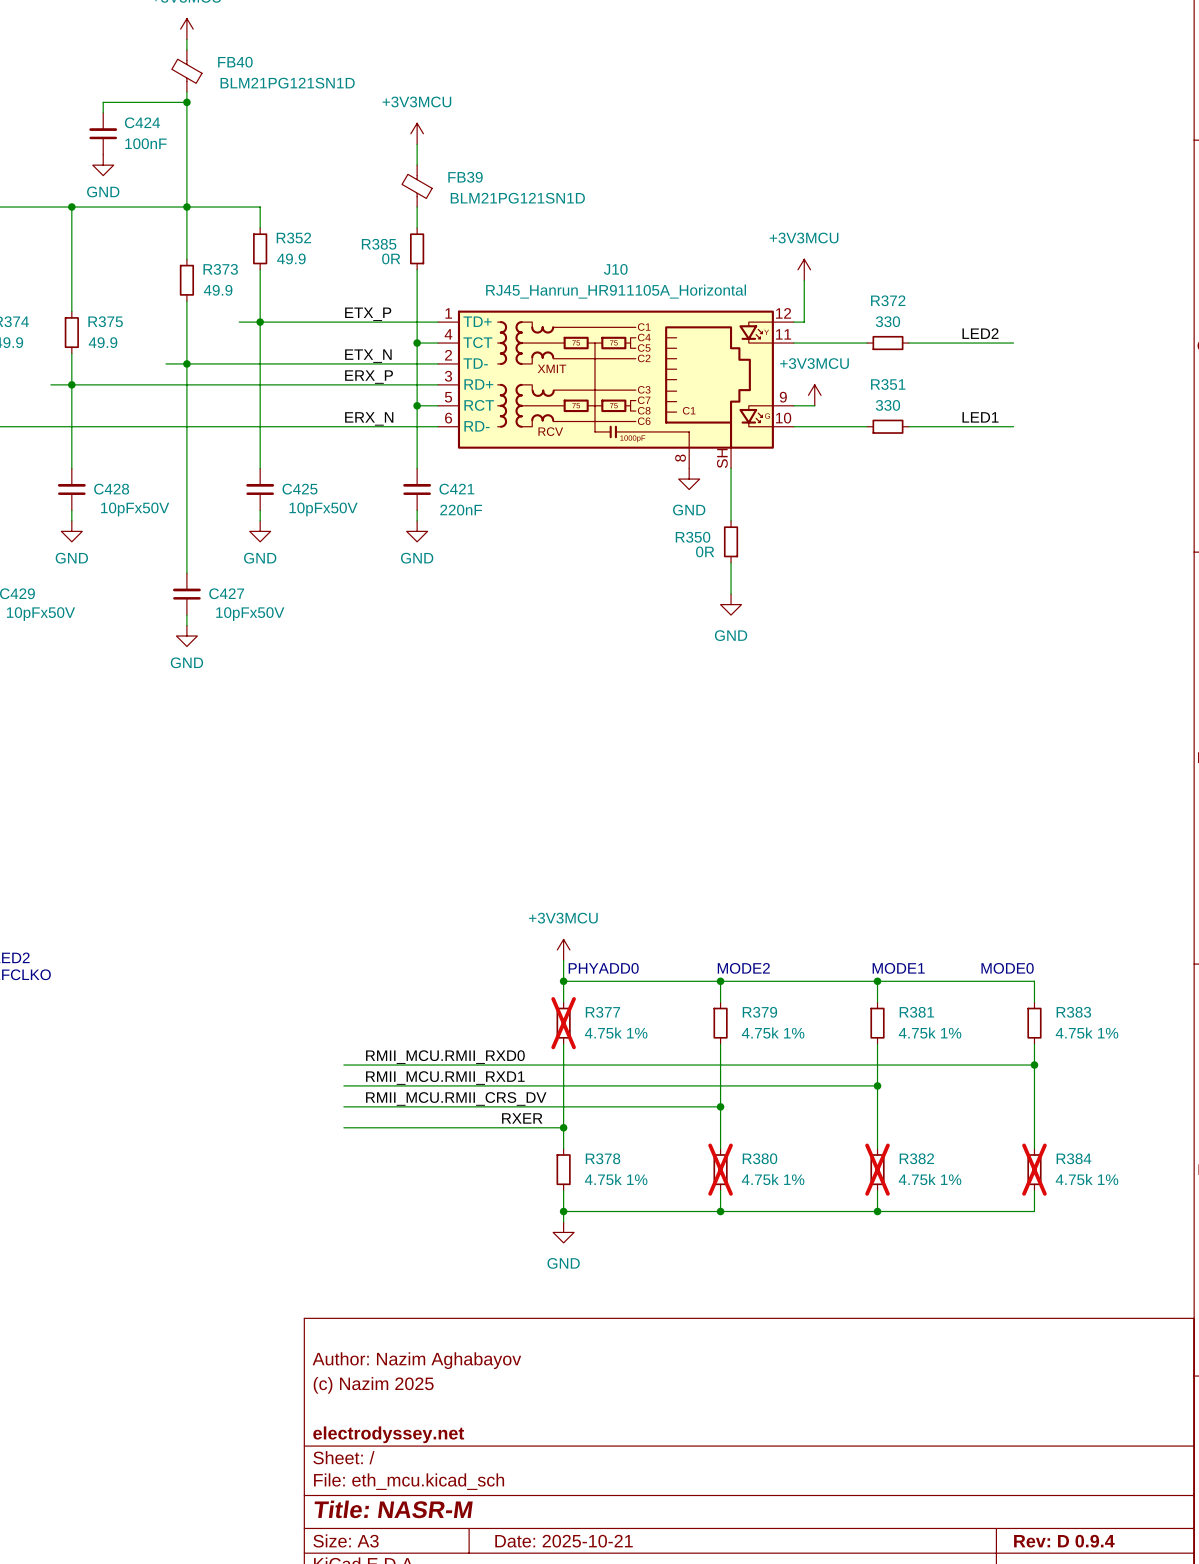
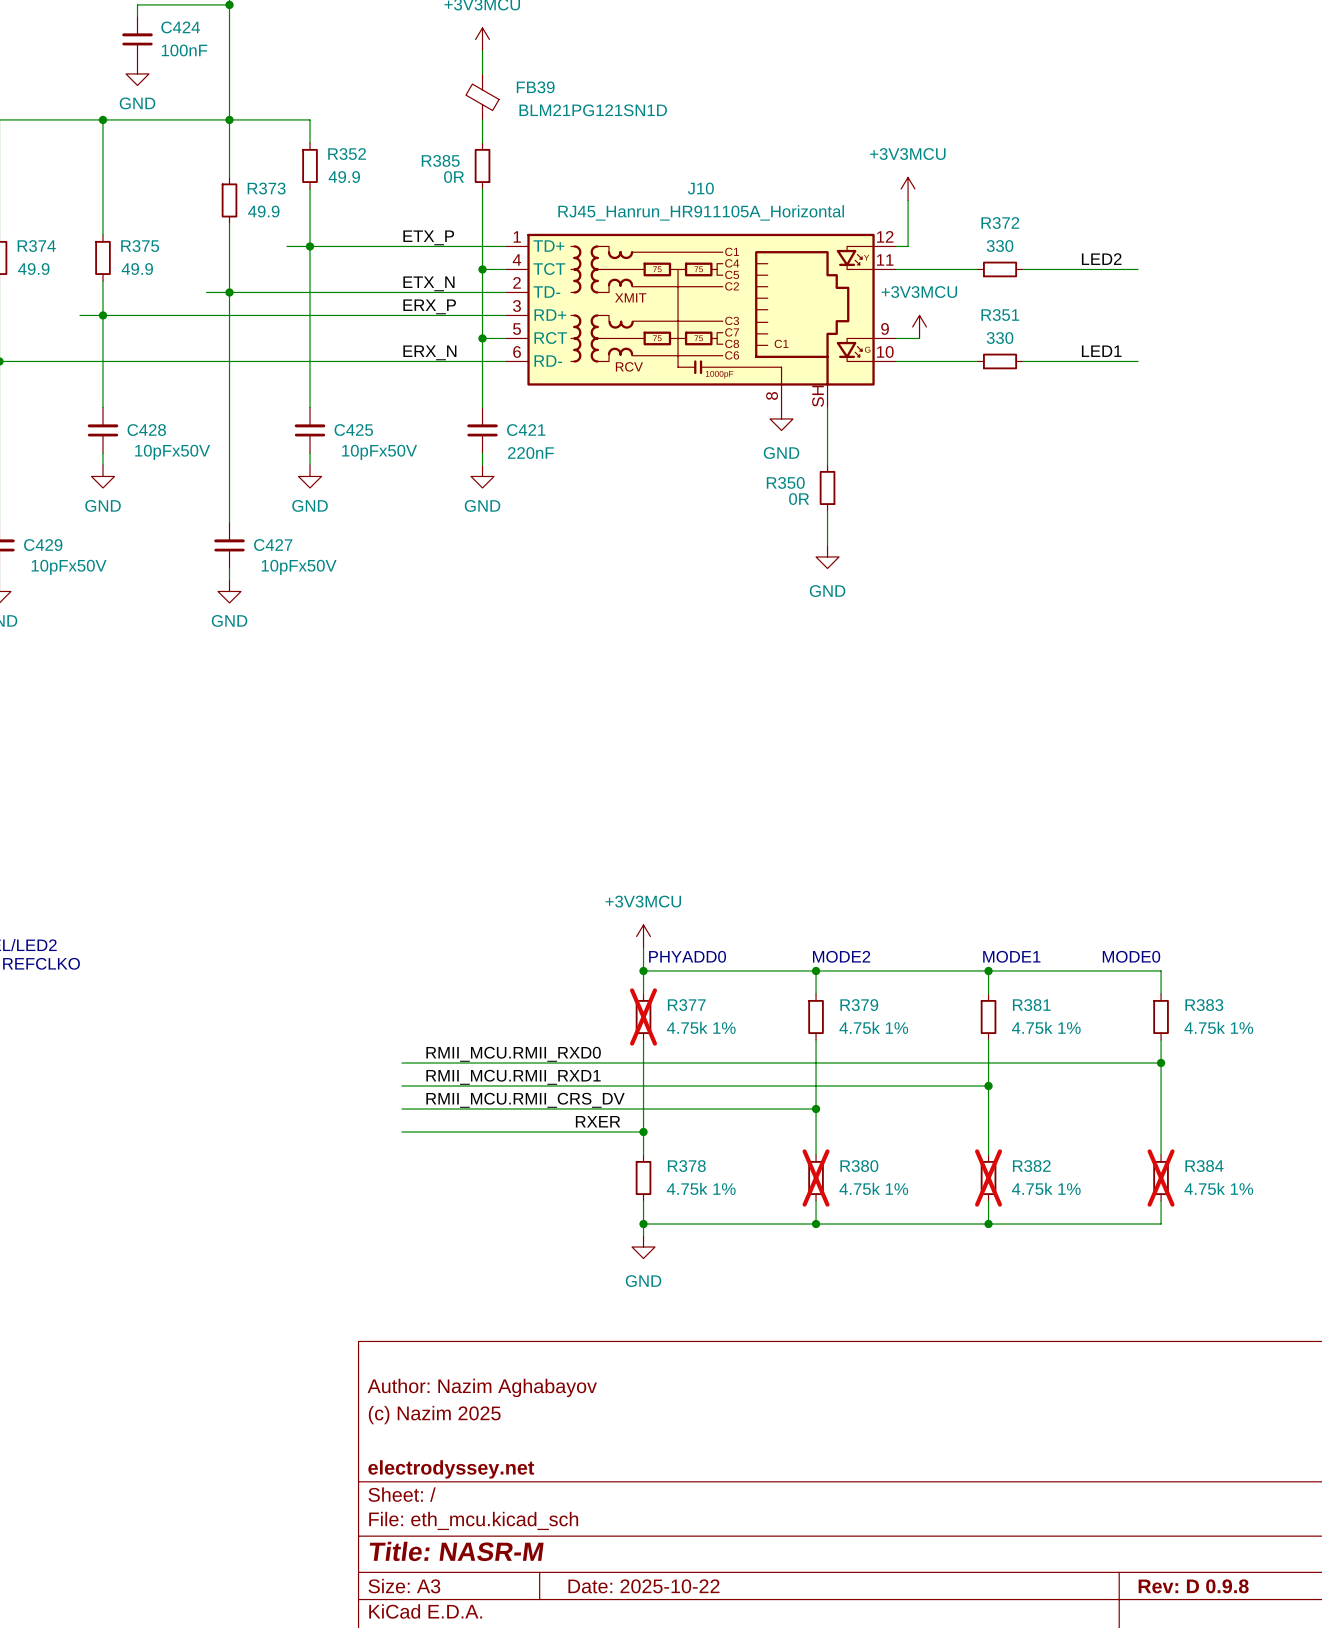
title block: Date: 2025-10-21 (564, 1541) -> Date: 2025-10-22 (643, 1586)
title block: Rev: D 0.9.4 (1064, 1541) -> Rev: D 0.9.8 (1193, 1586)

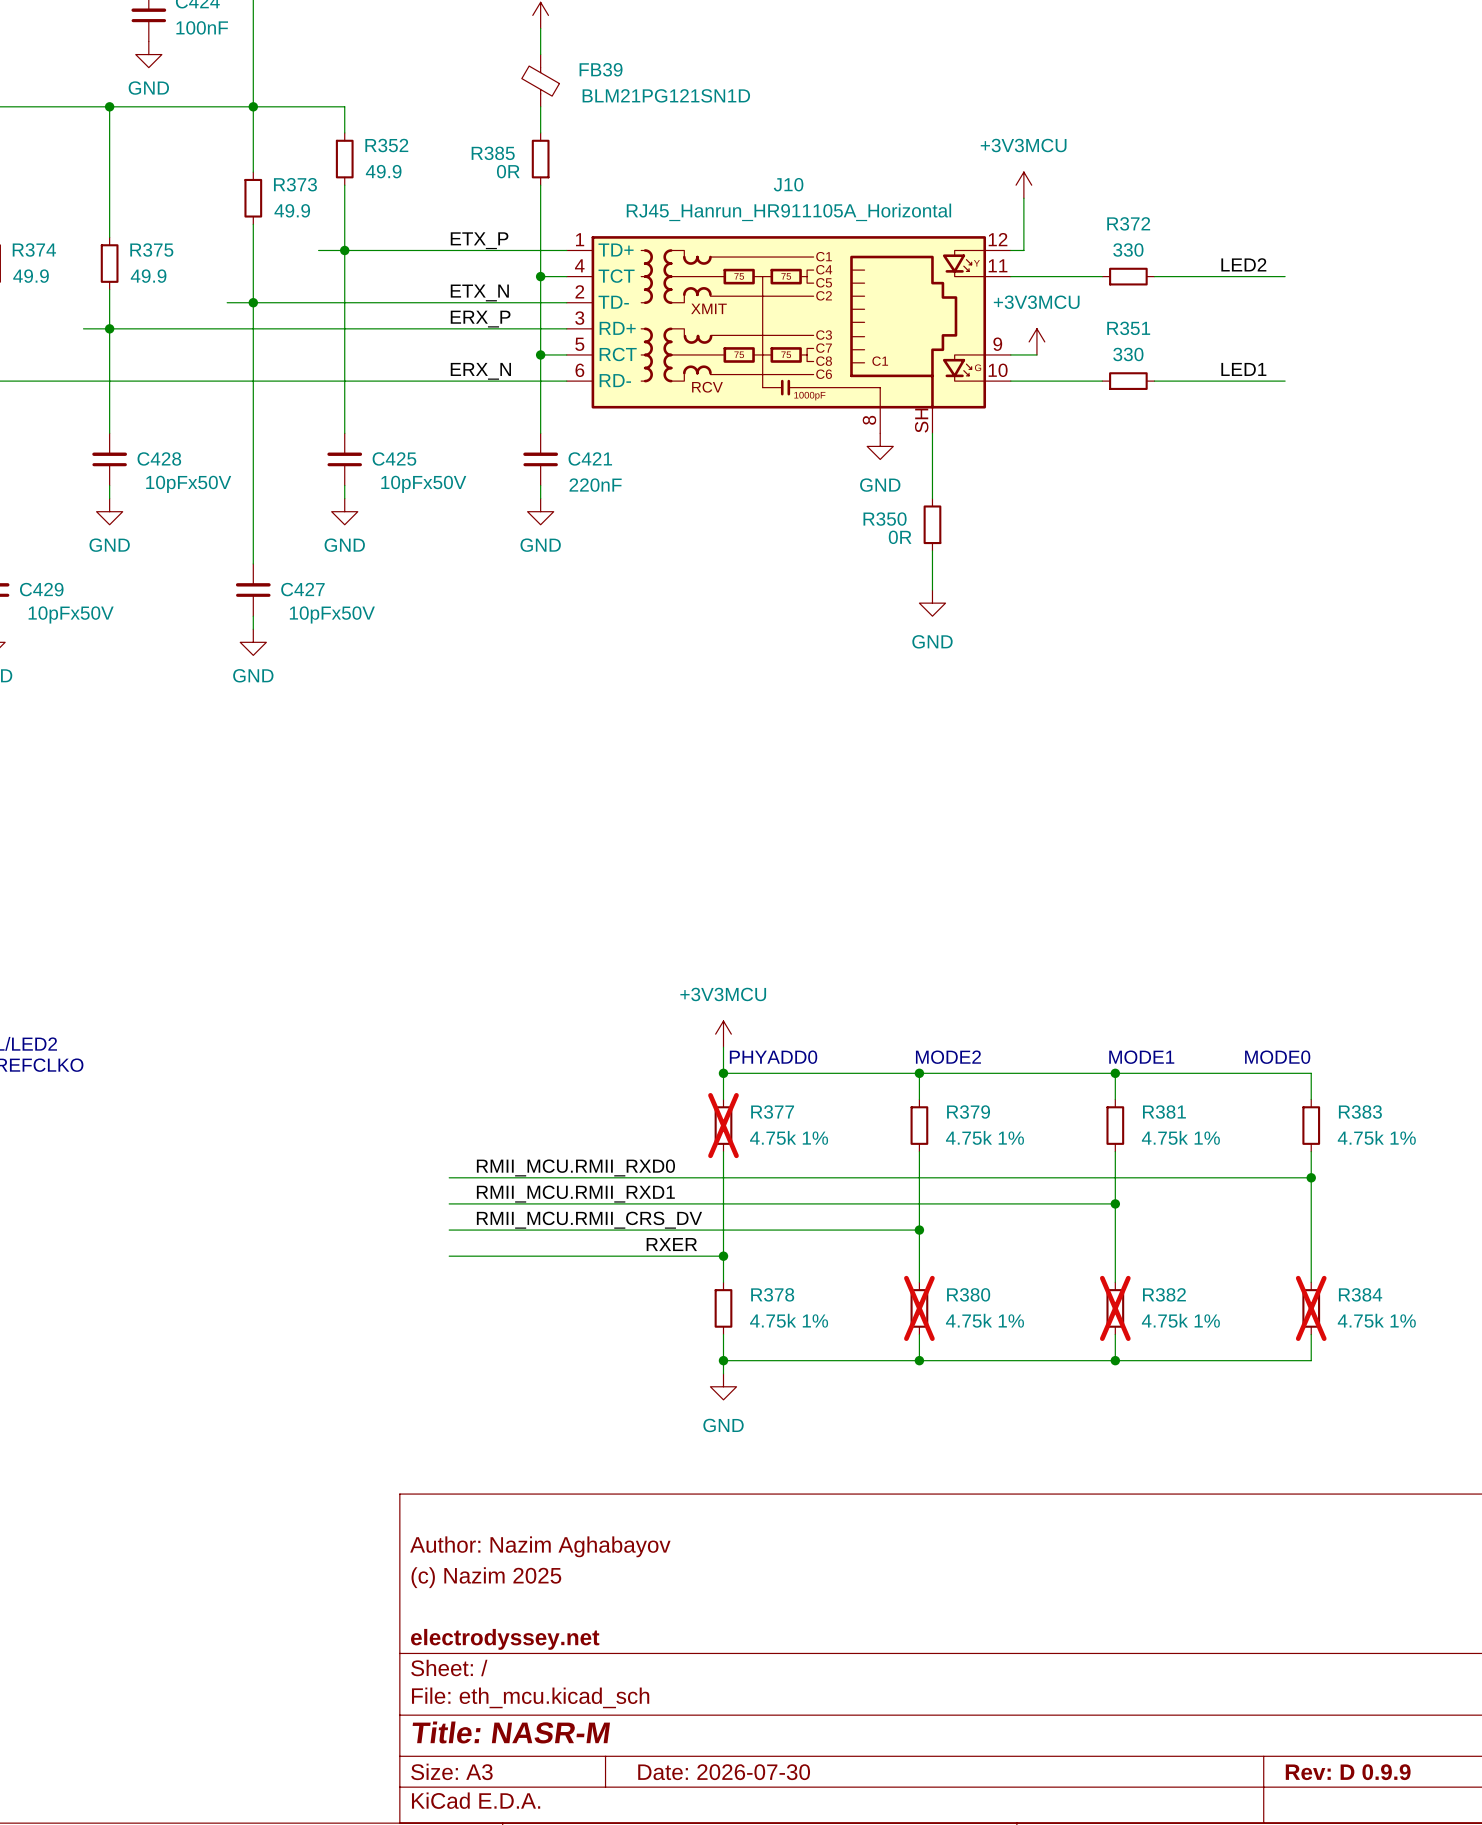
title block: Date: 2025-10-22 (643, 1586) -> Date: 2026-07-30 (724, 1772)
title block: Rev: D 0.9.8 (1193, 1586) -> Rev: D 0.9.9 (1348, 1772)

